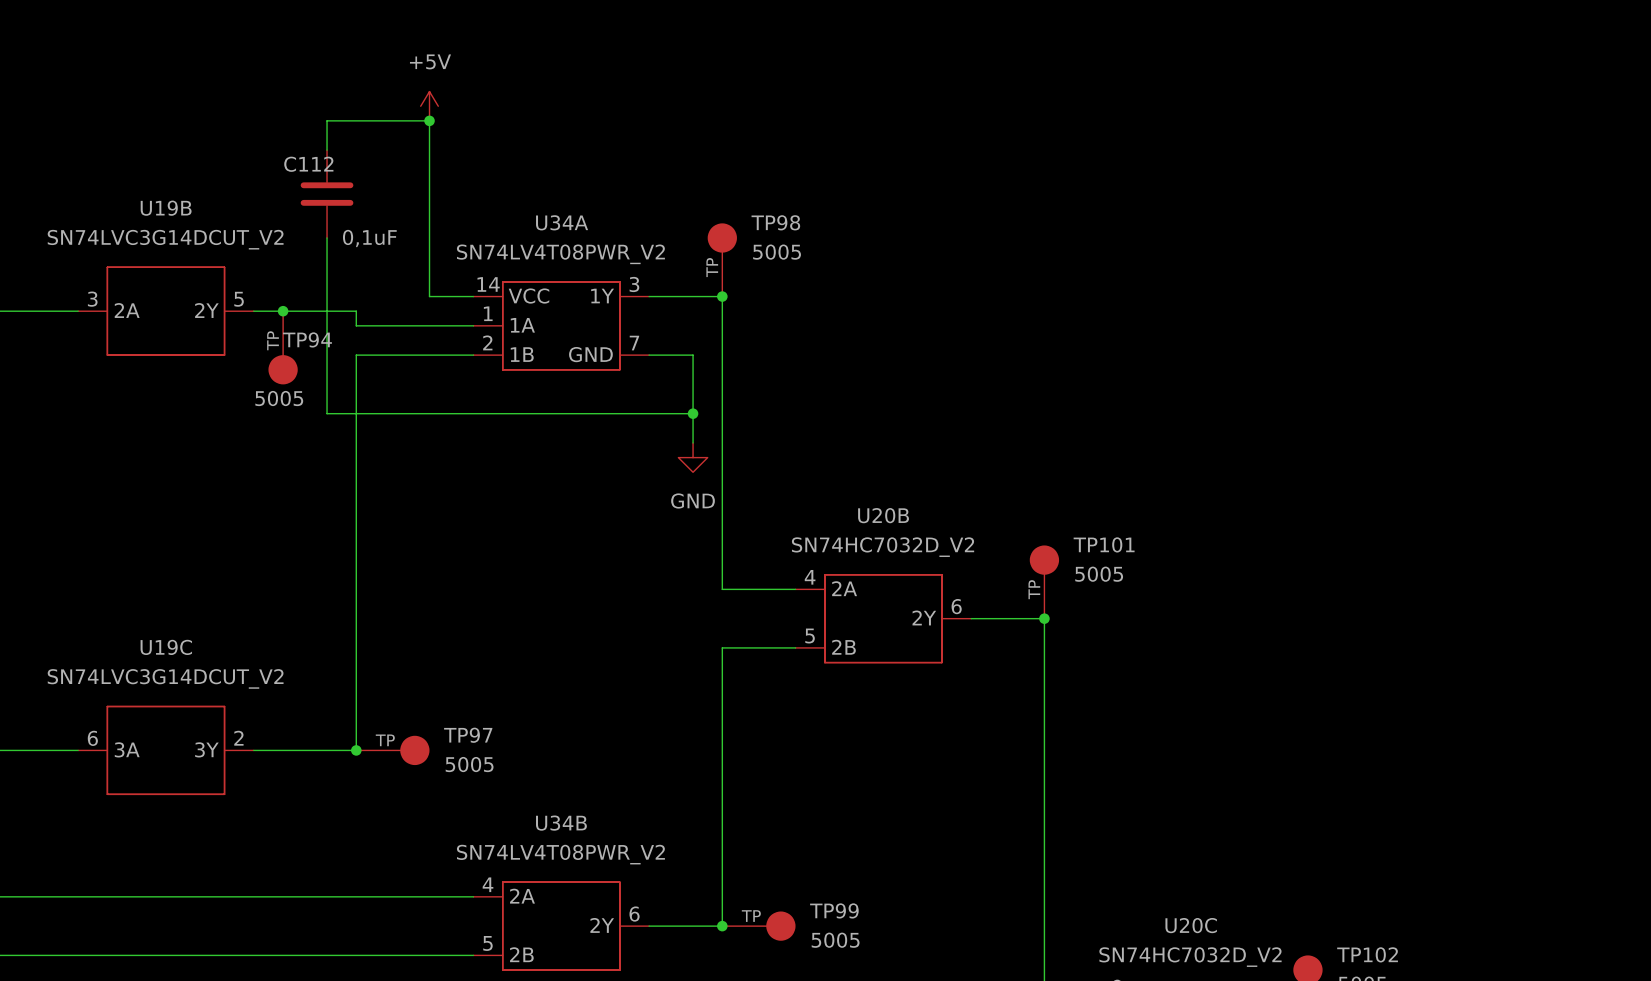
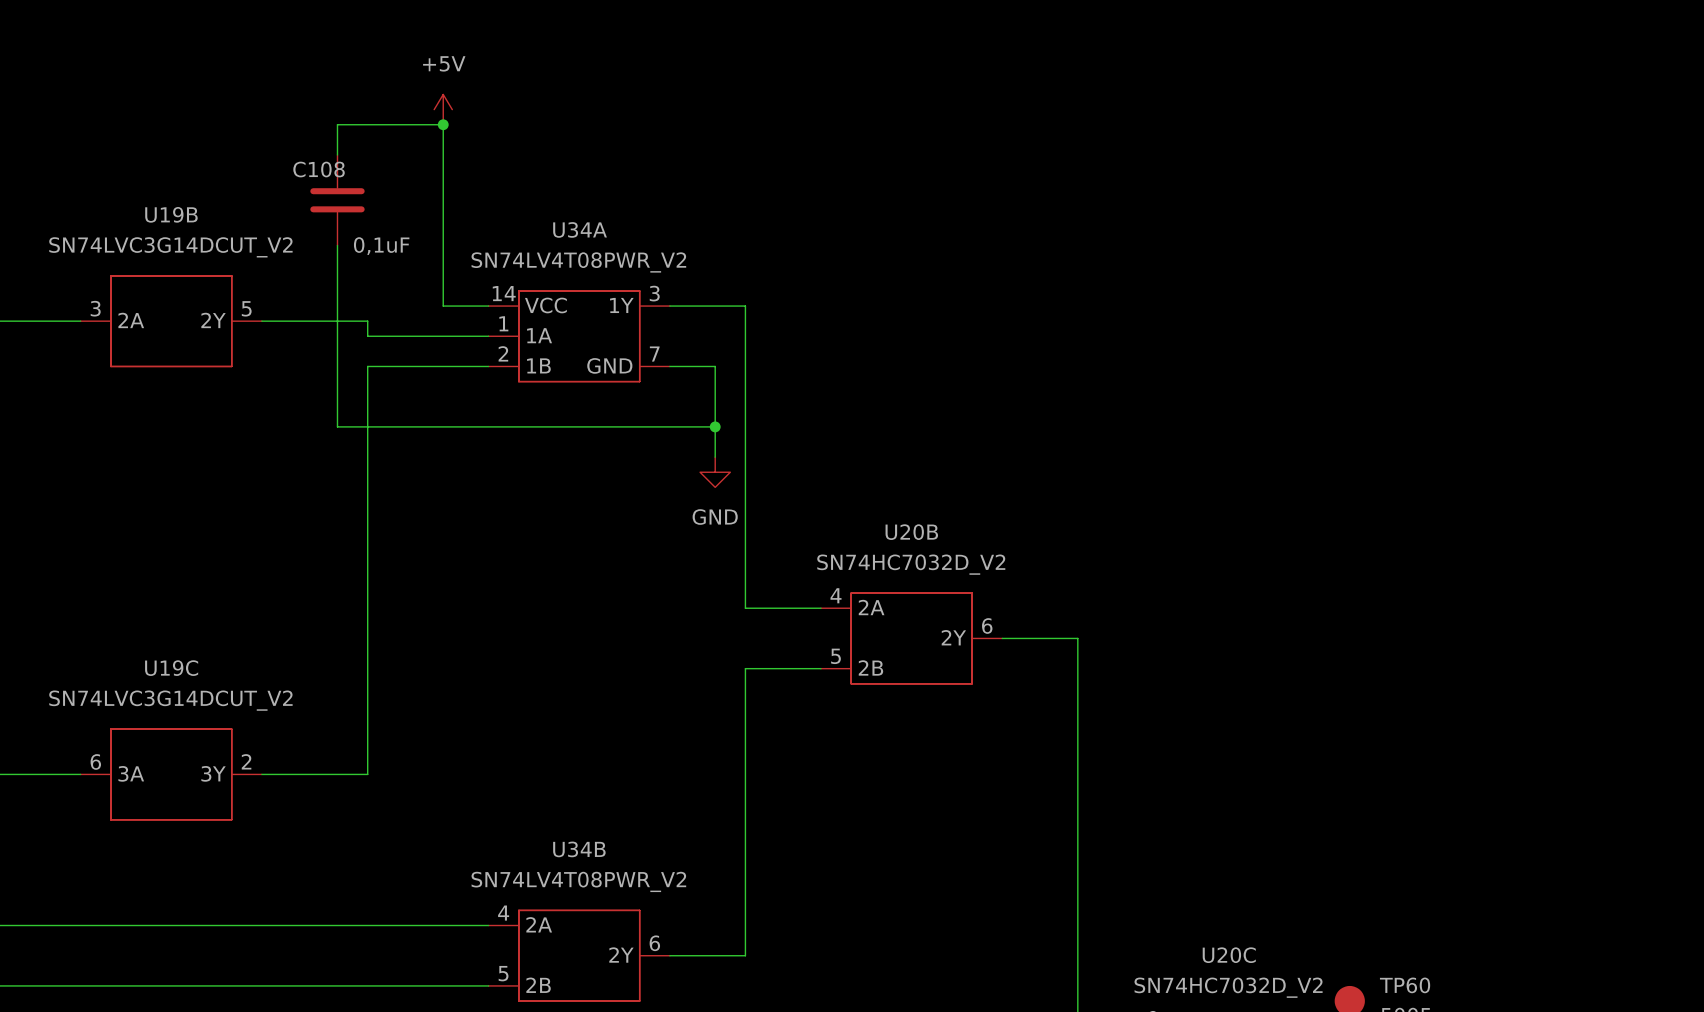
C112 name: C112 (308, 164) -> C108 (319, 169)
TP98: 5005 (722, 259) -> none
junction: (722, 296) -> none
junction: (283, 311) -> none
TP94: 5005 (283, 347) -> none
TP101: 5005 (1044, 582) -> none
junction: (1044, 618) -> none
junction: (356, 750) -> none
TP97: 5005 (392, 750) -> none
junction: (722, 926) -> none
TP99: 5005 (758, 926) -> none
TP102 name: TP102 (1367, 954) -> TP60 (1405, 985)

